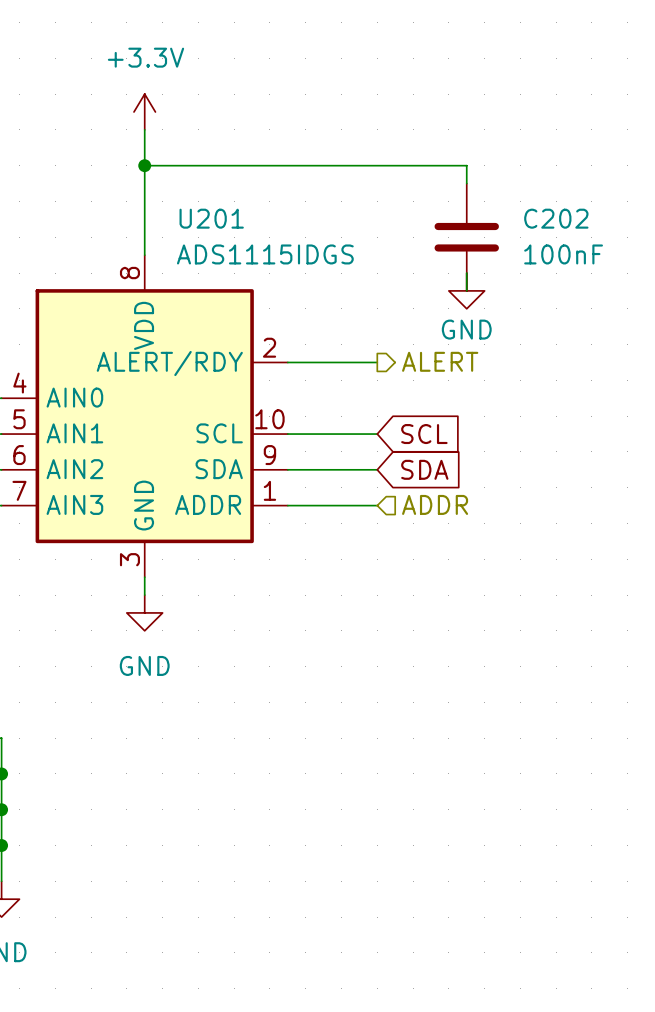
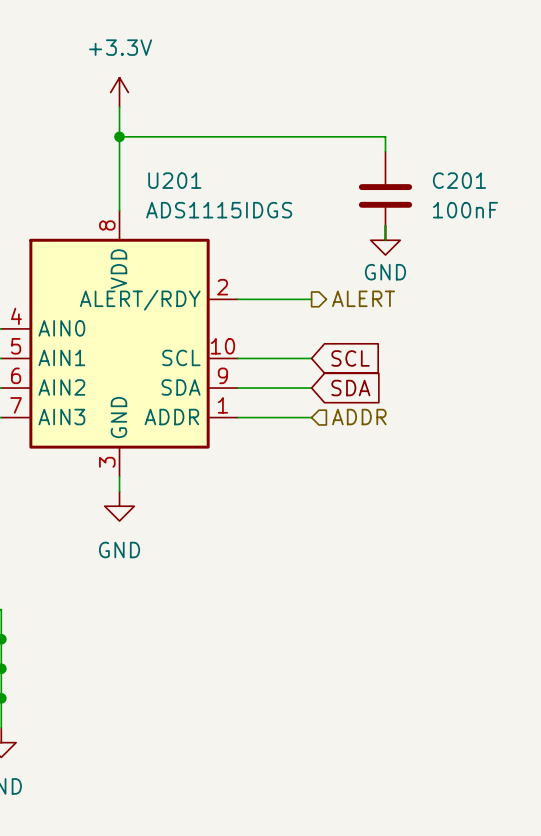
C202 name: C202 (556, 218) -> C201 (459, 180)

